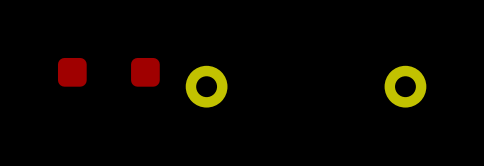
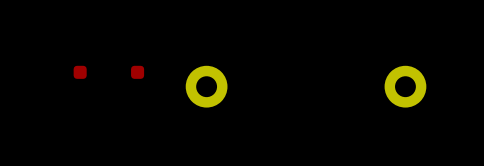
part footprint: [57, 57, 160, 87] -> [73, 65, 145, 79]

